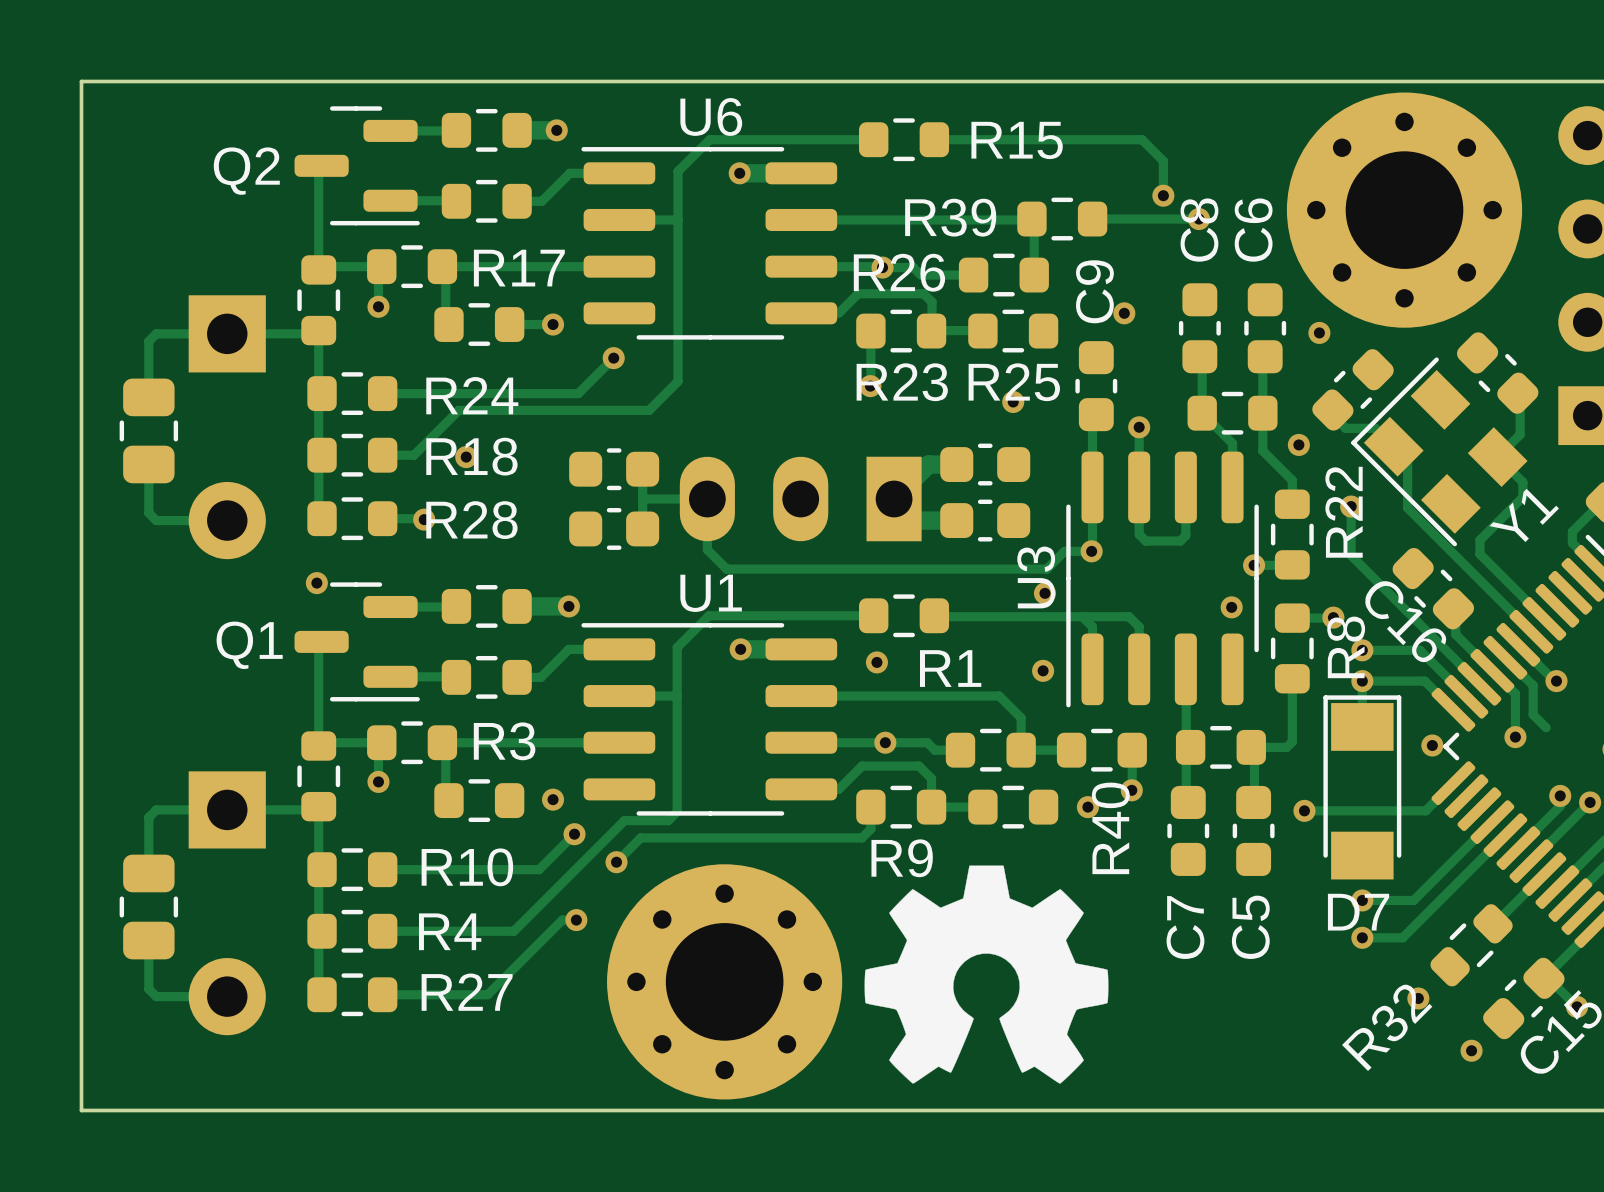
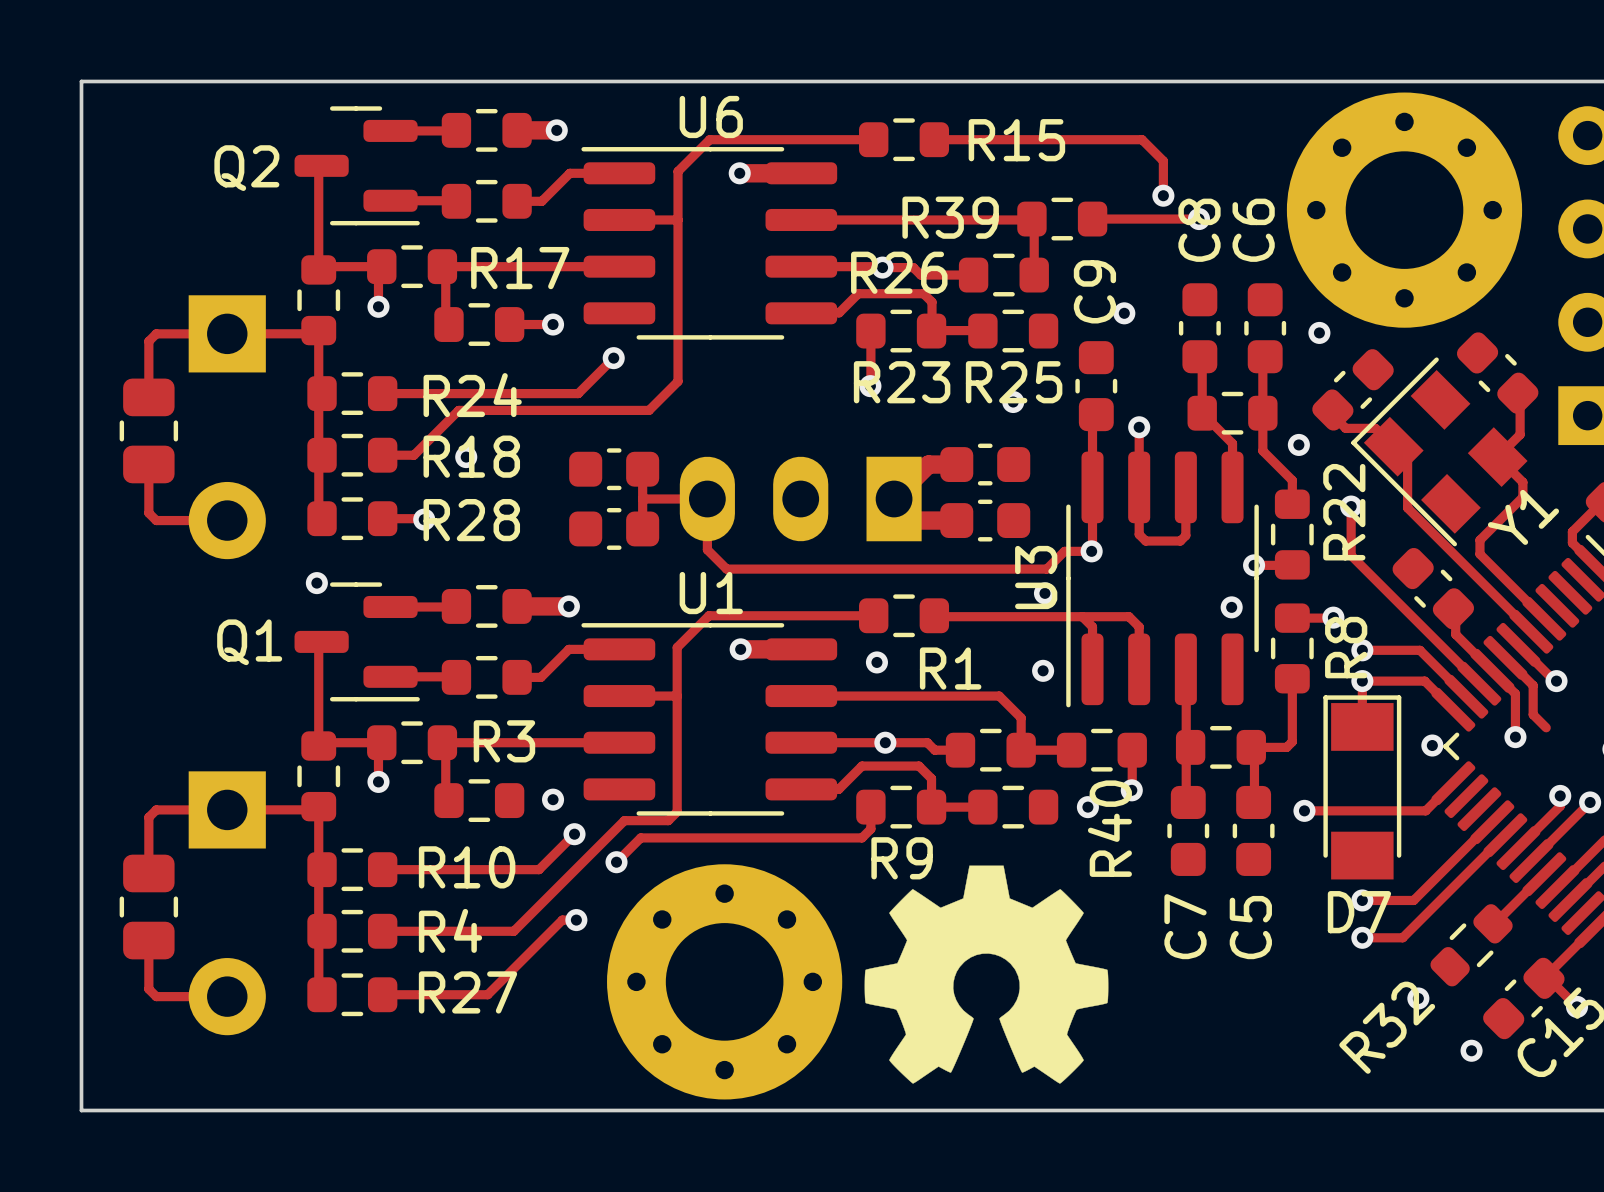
C16 name: C16 (1406, 621) -> none

